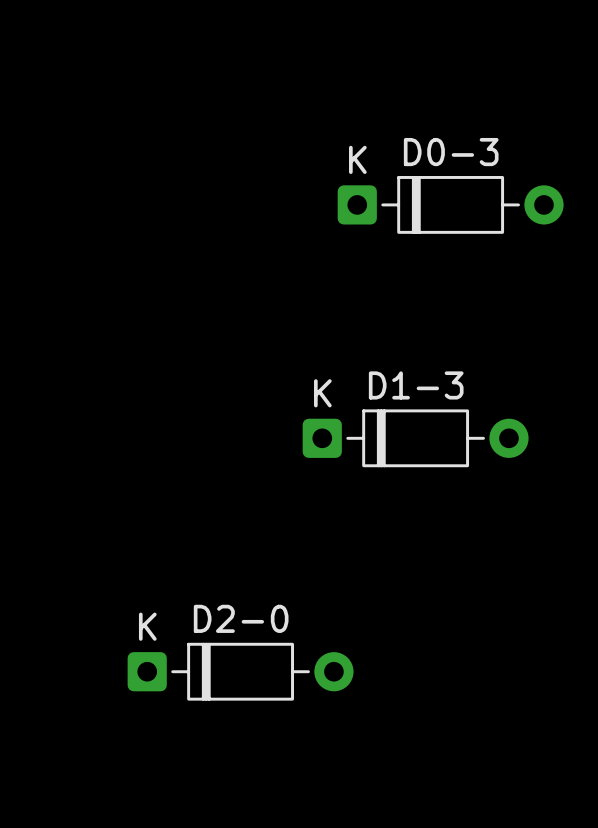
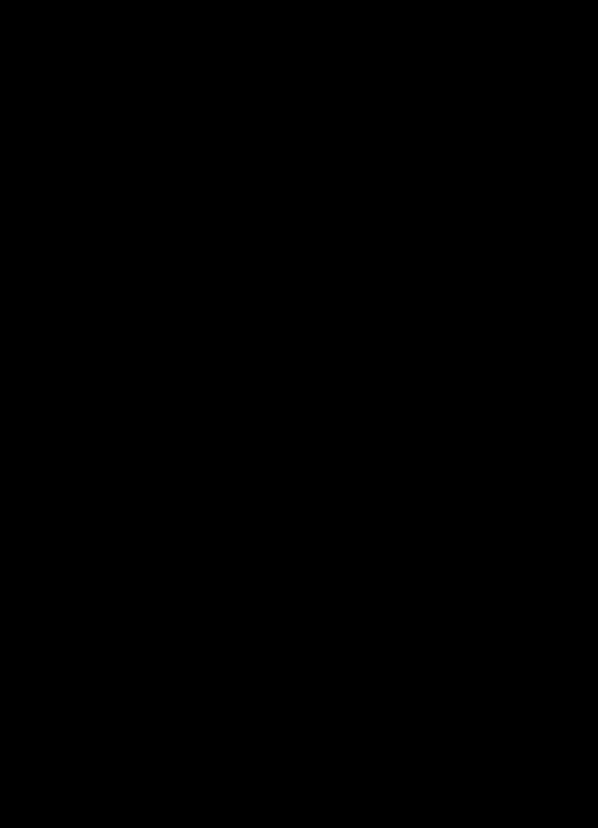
D0-3: (450, 204) -> none
D1-3: (415, 438) -> none
D2-0: (240, 671) -> none

